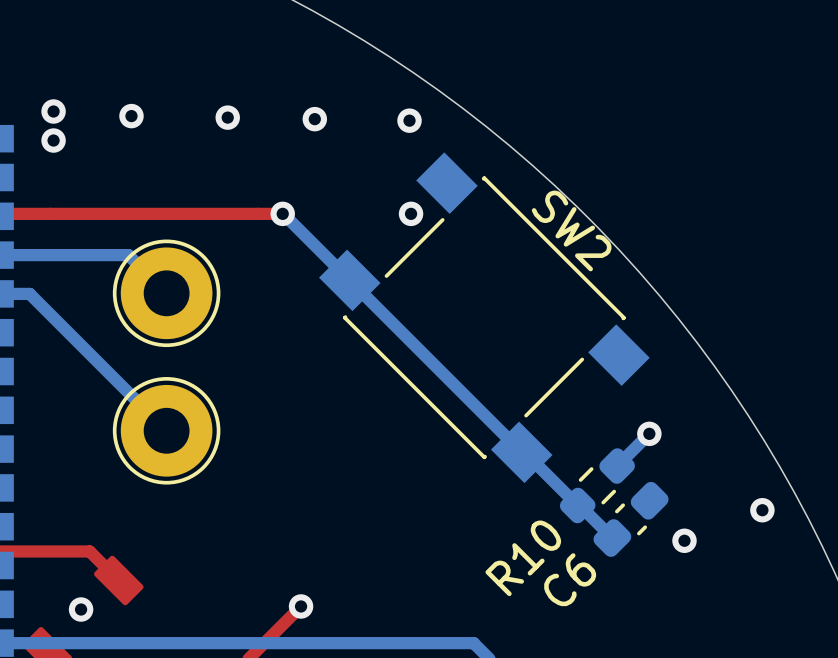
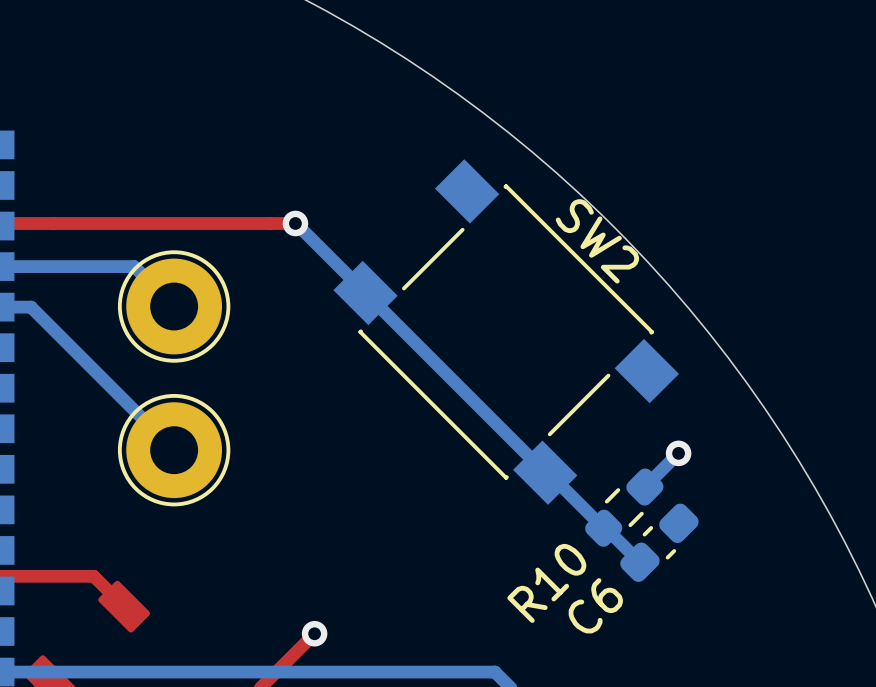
via: (53, 111) -> none
via: (131, 116) -> none
via: (227, 117) -> none
via: (314, 119) -> none
via: (409, 120) -> none
via: (53, 140) -> none
via: (411, 213) -> none
via: (762, 510) -> none
via: (684, 540) -> none
via: (81, 609) -> none

